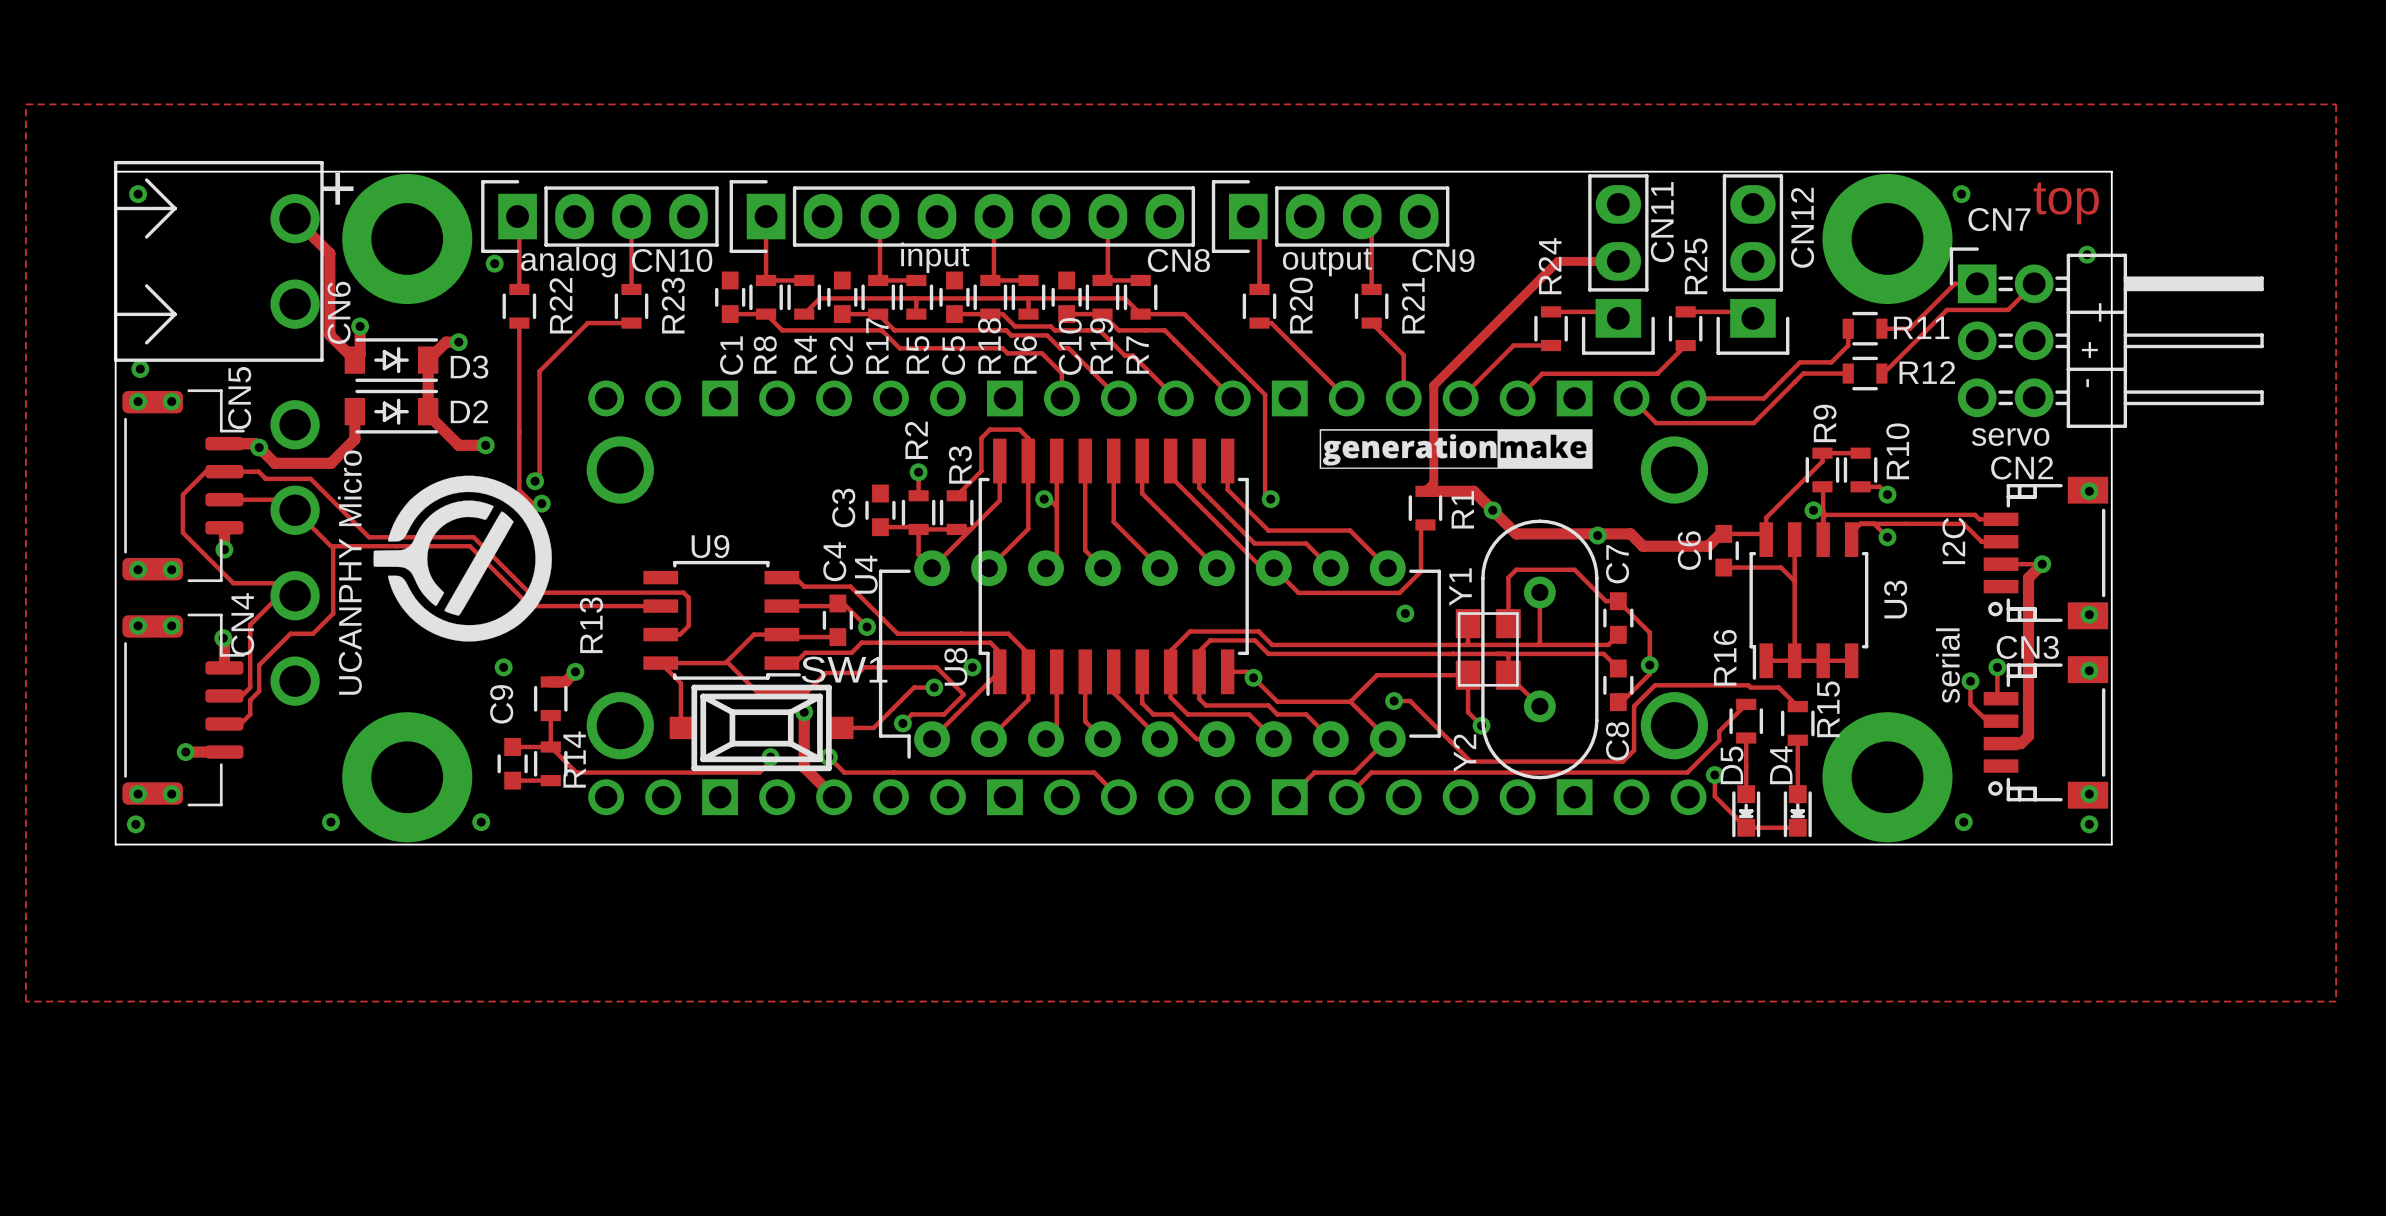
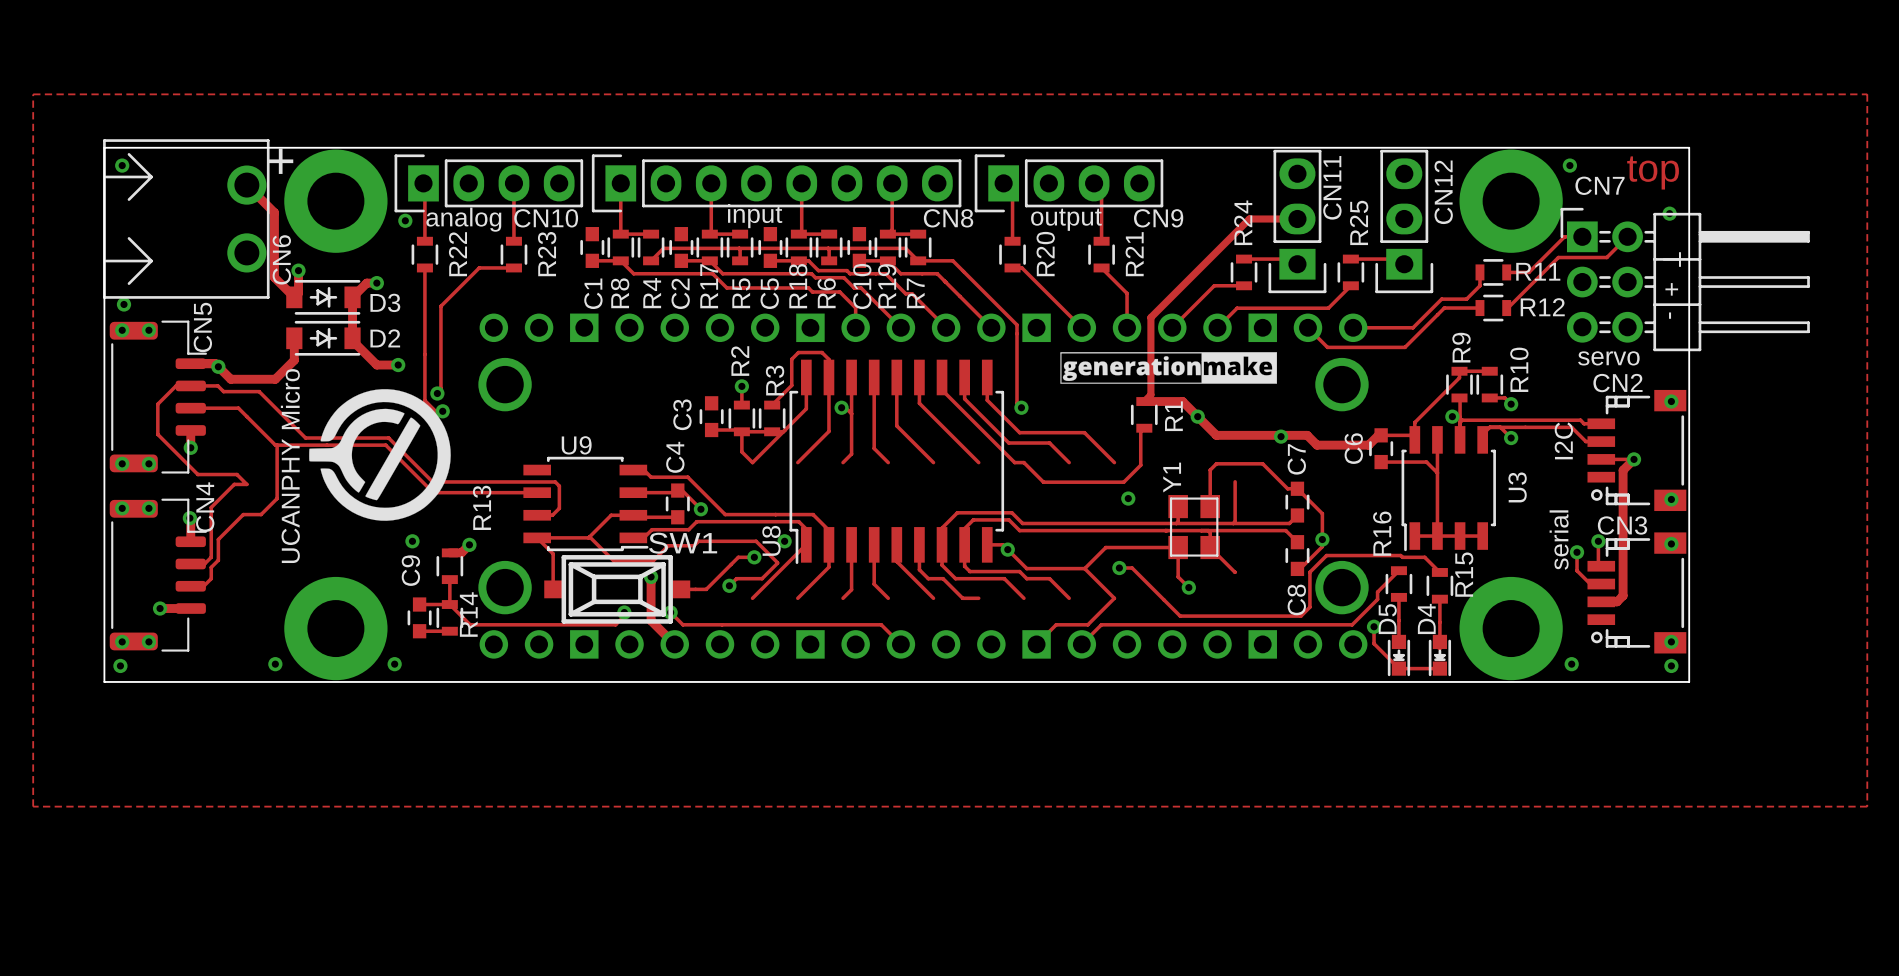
part: (295, 552) -> none
Y2: (1539, 649) -> none
U4: (1159, 654) -> none

